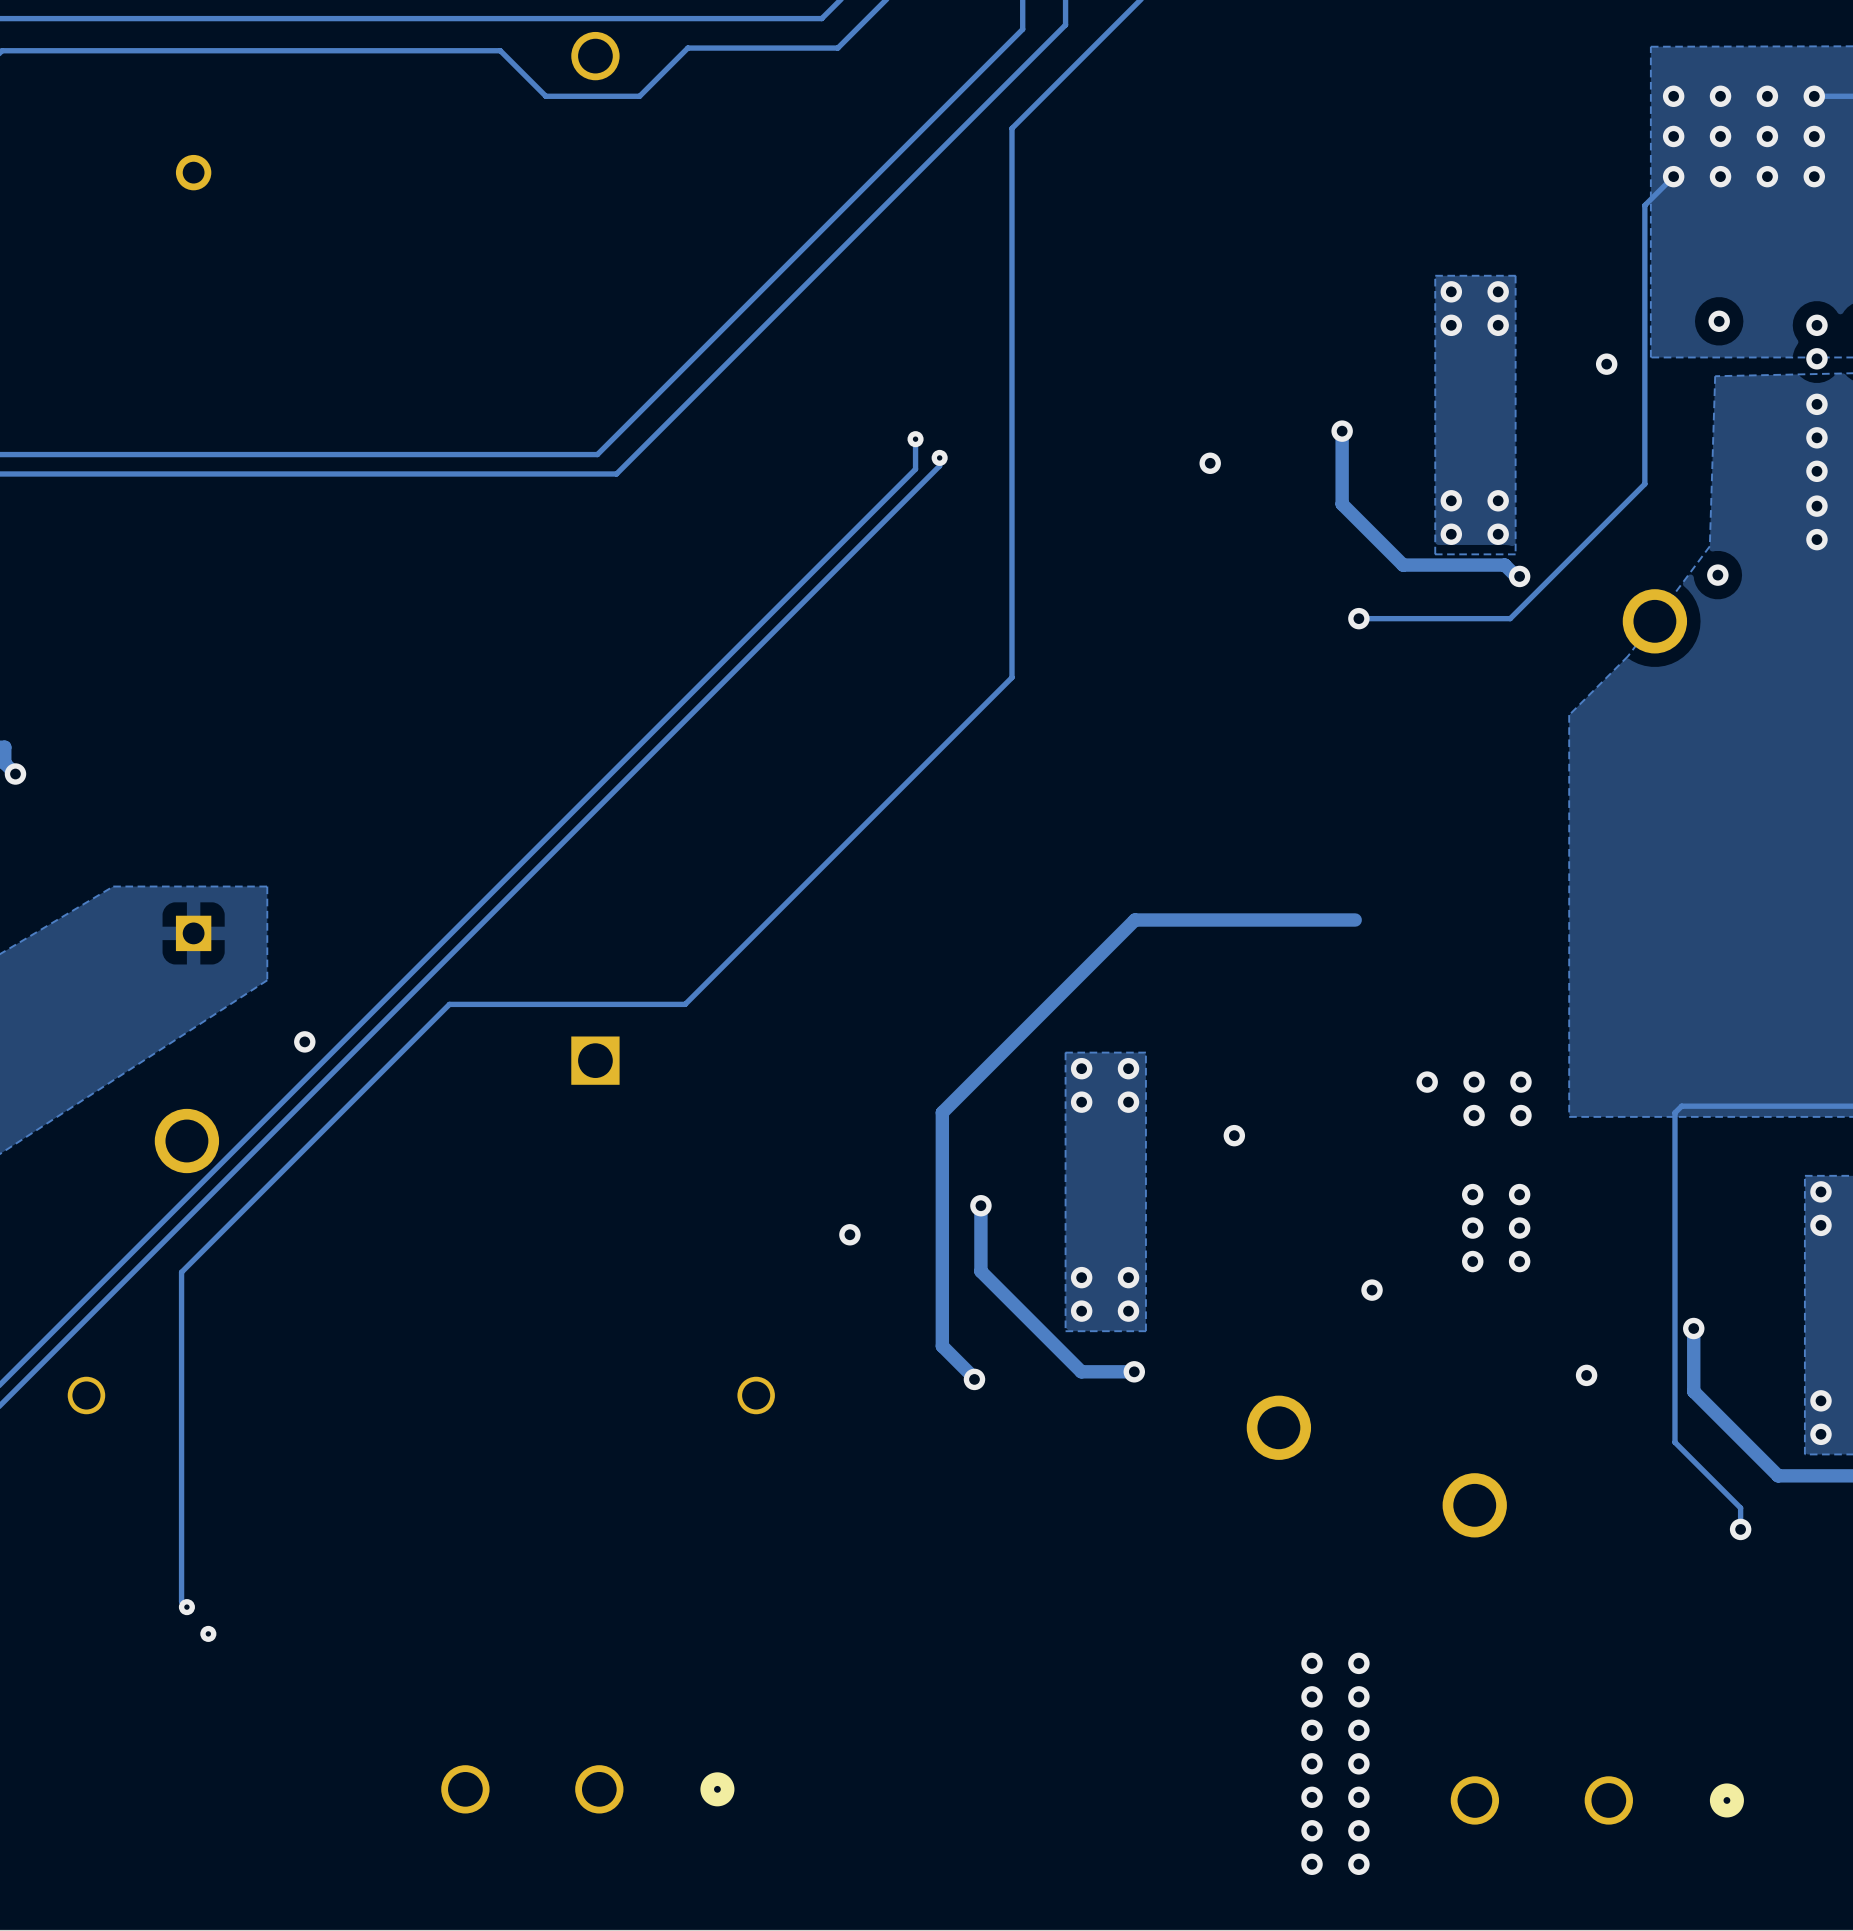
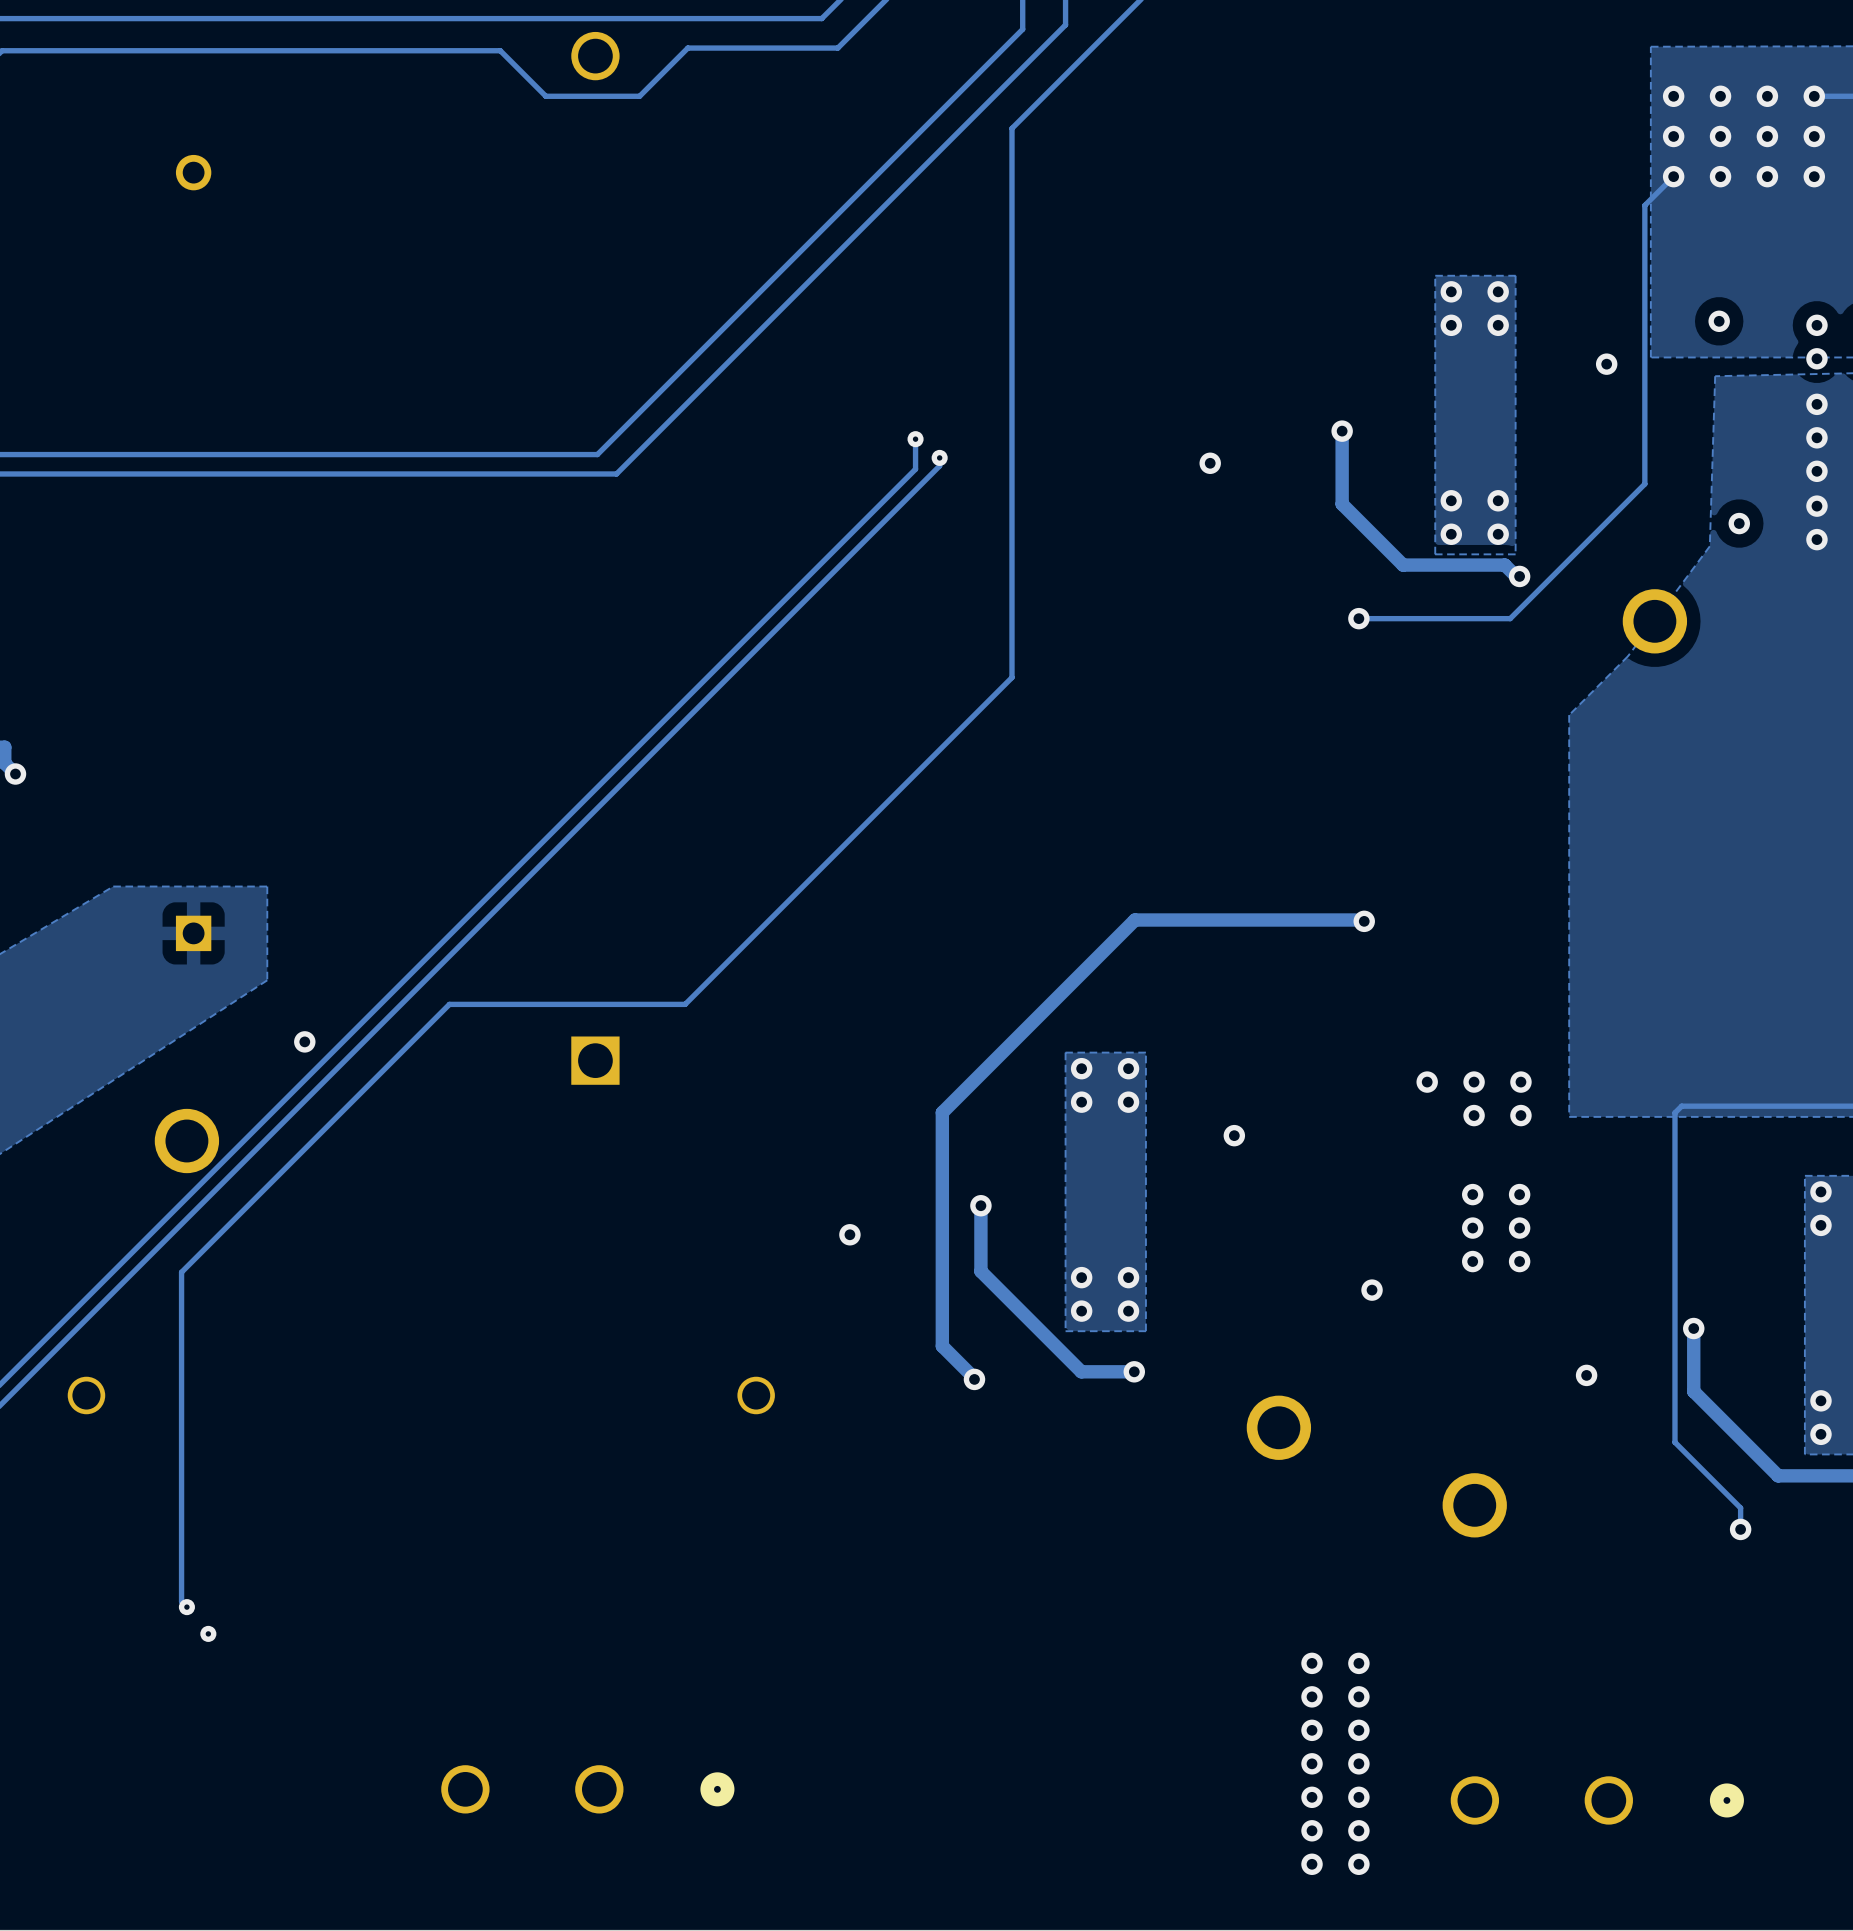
via position: (1717, 575) -> (1739, 523)
via: none -> (1364, 921)

